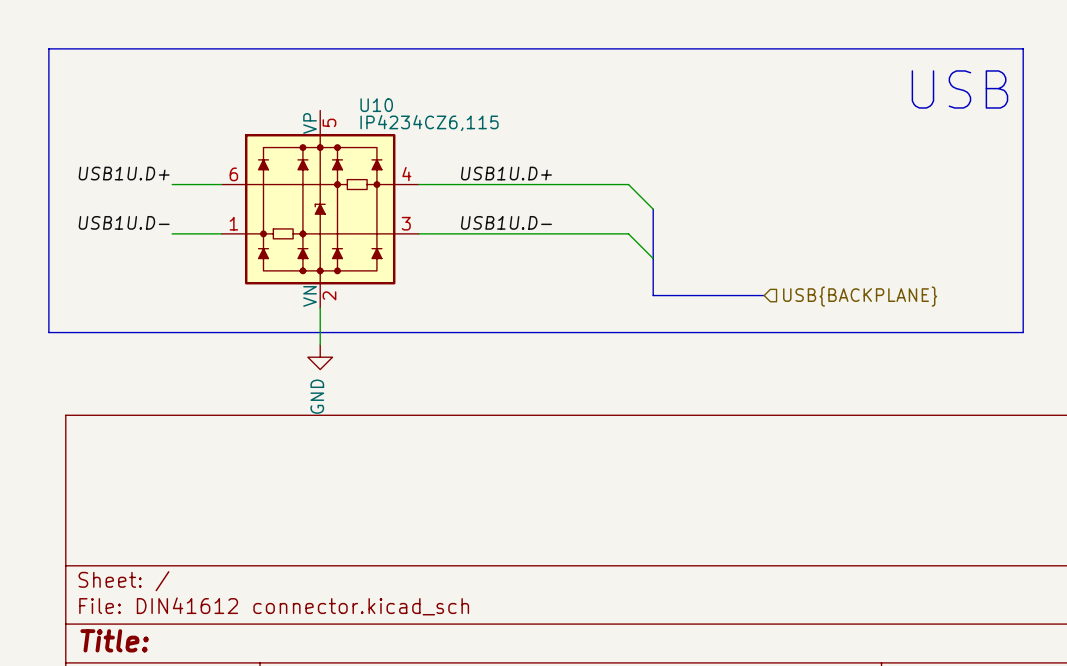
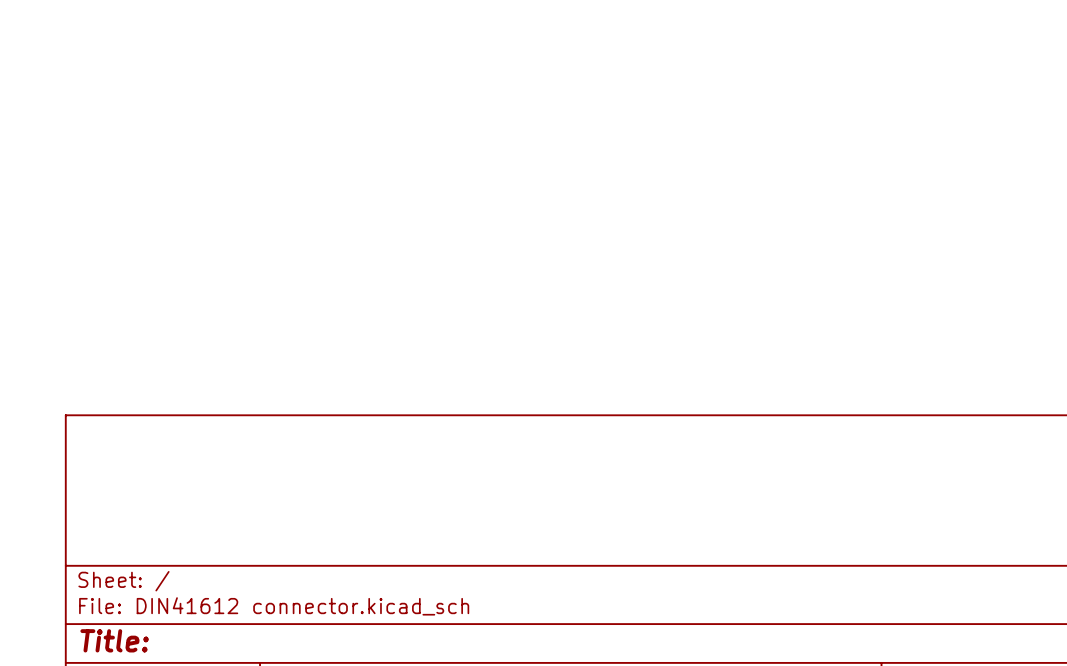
line: (48, 48) (1023, 48) (1023, 332) (48, 332) (48, 48) -> none
text: USB (959, 89) -> none
label: USB1U.D+ (124, 173) -> none
label: USB1U.D+ (506, 173) -> none
wire: (172, 184) (221, 184) -> none
wire: (418, 184) (628, 184) (653, 209) -> none
U10: IP4234CZ6,115 (320, 209) -> none
bus: (653, 209) (653, 295) (764, 295) -> none
label: USB1U.D- (124, 222) -> none
label: USB1U.D- (506, 222) -> none
wire: (172, 233) (221, 233) -> none
wire: (418, 233) (628, 233) (653, 258) -> none
hierarchical label: USB{BACKPLANE} (860, 296) -> none
wire: (320, 307) (320, 344) -> none
power symbol: GND (320, 357) -> none

